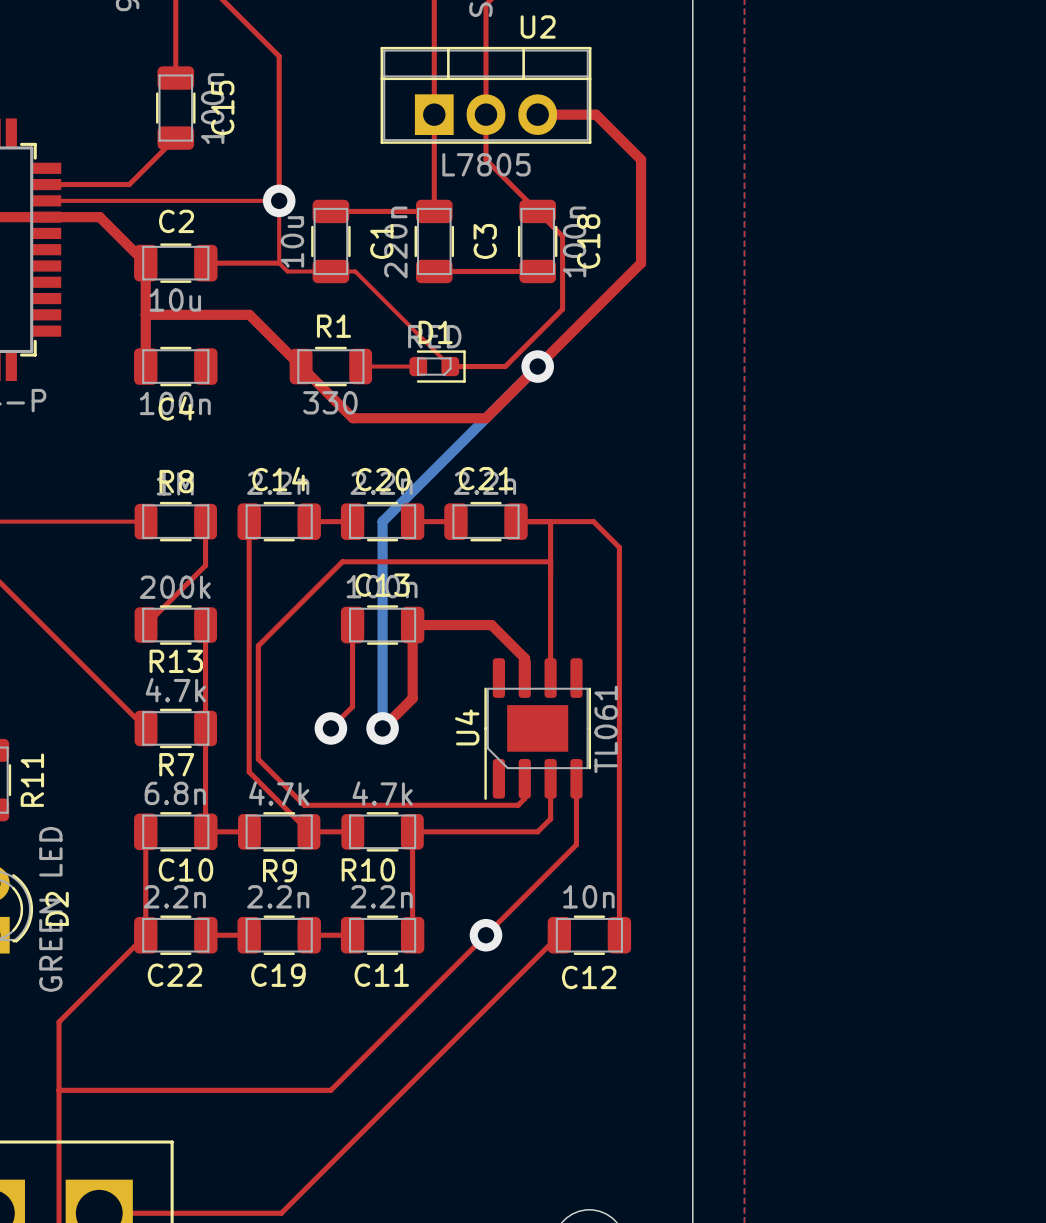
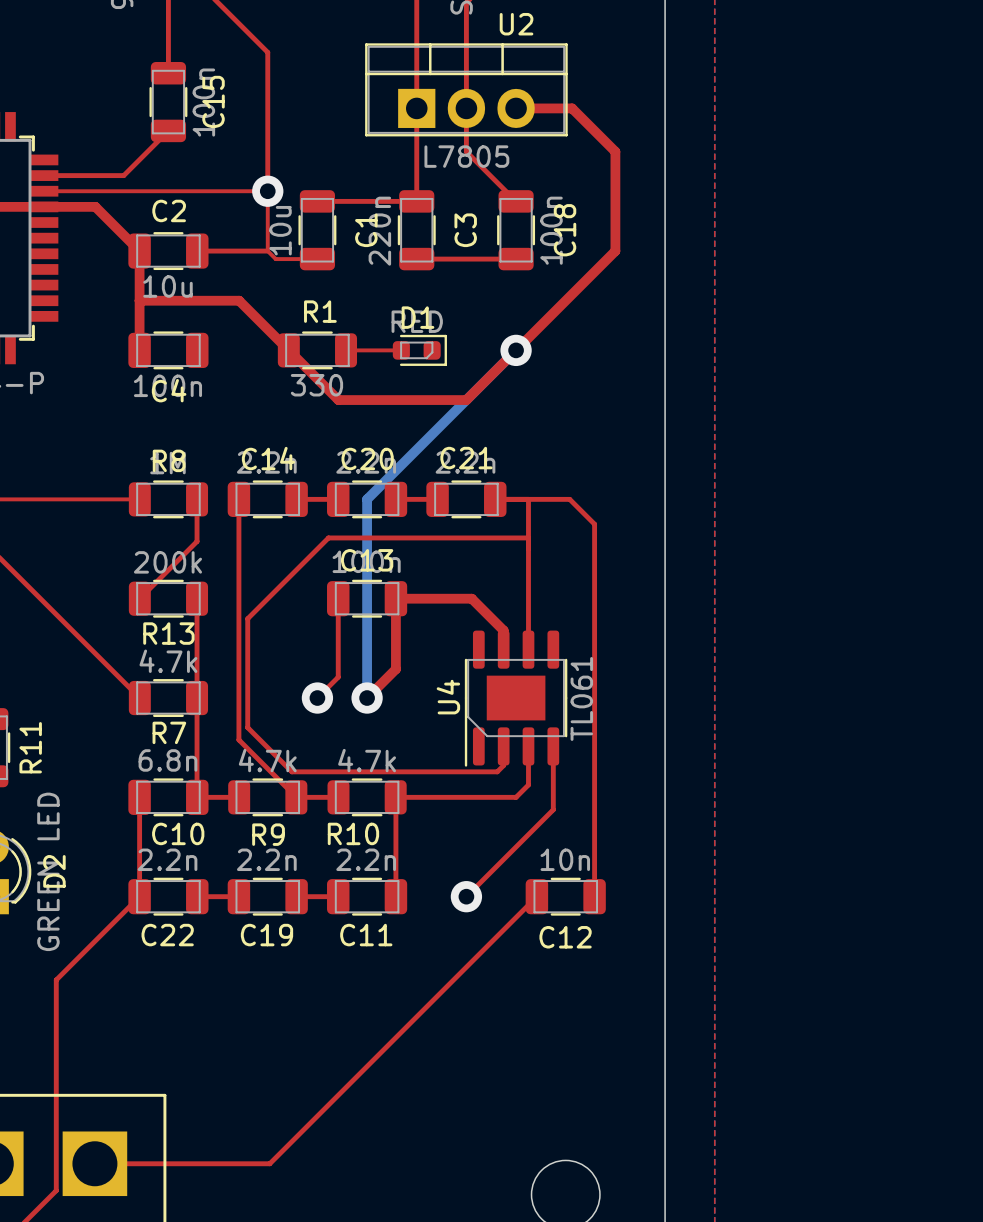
top track: (537, 211) (562, 236) (562, 309) (505, 366) (450, 366) (355, 271) (330, 271) -> none
top track: (485, 935) (330, 1090) (59, 1090) -> none

